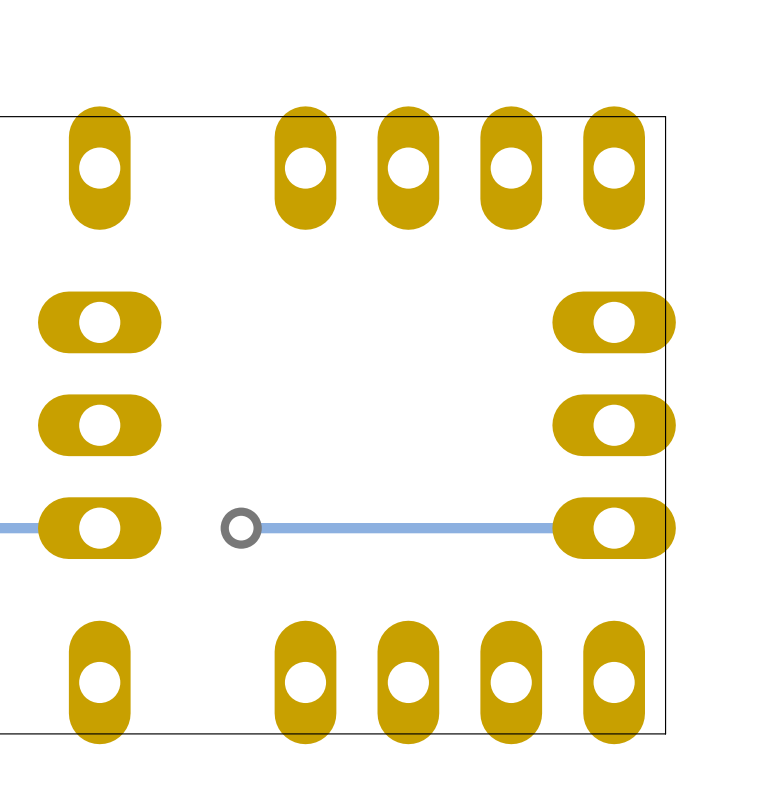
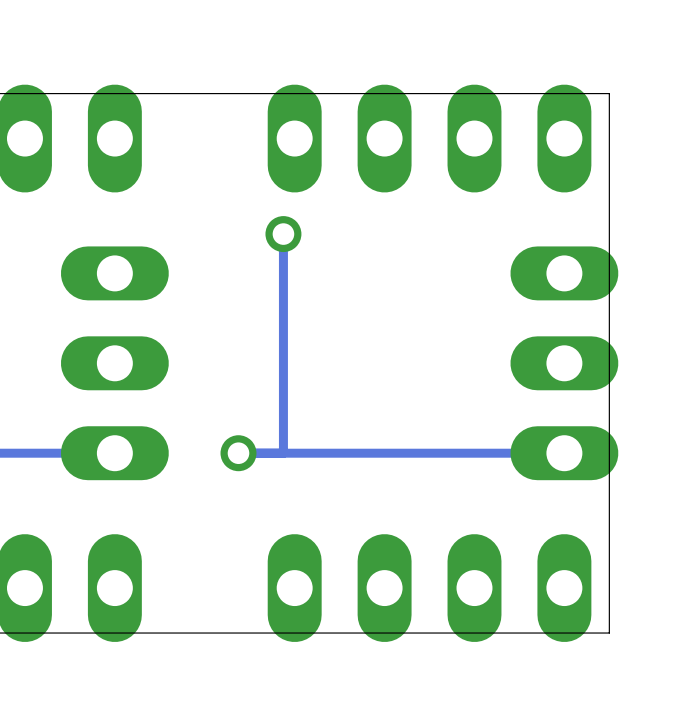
track: none -> (283, 234) (283, 453)
via: none -> (283, 234)

